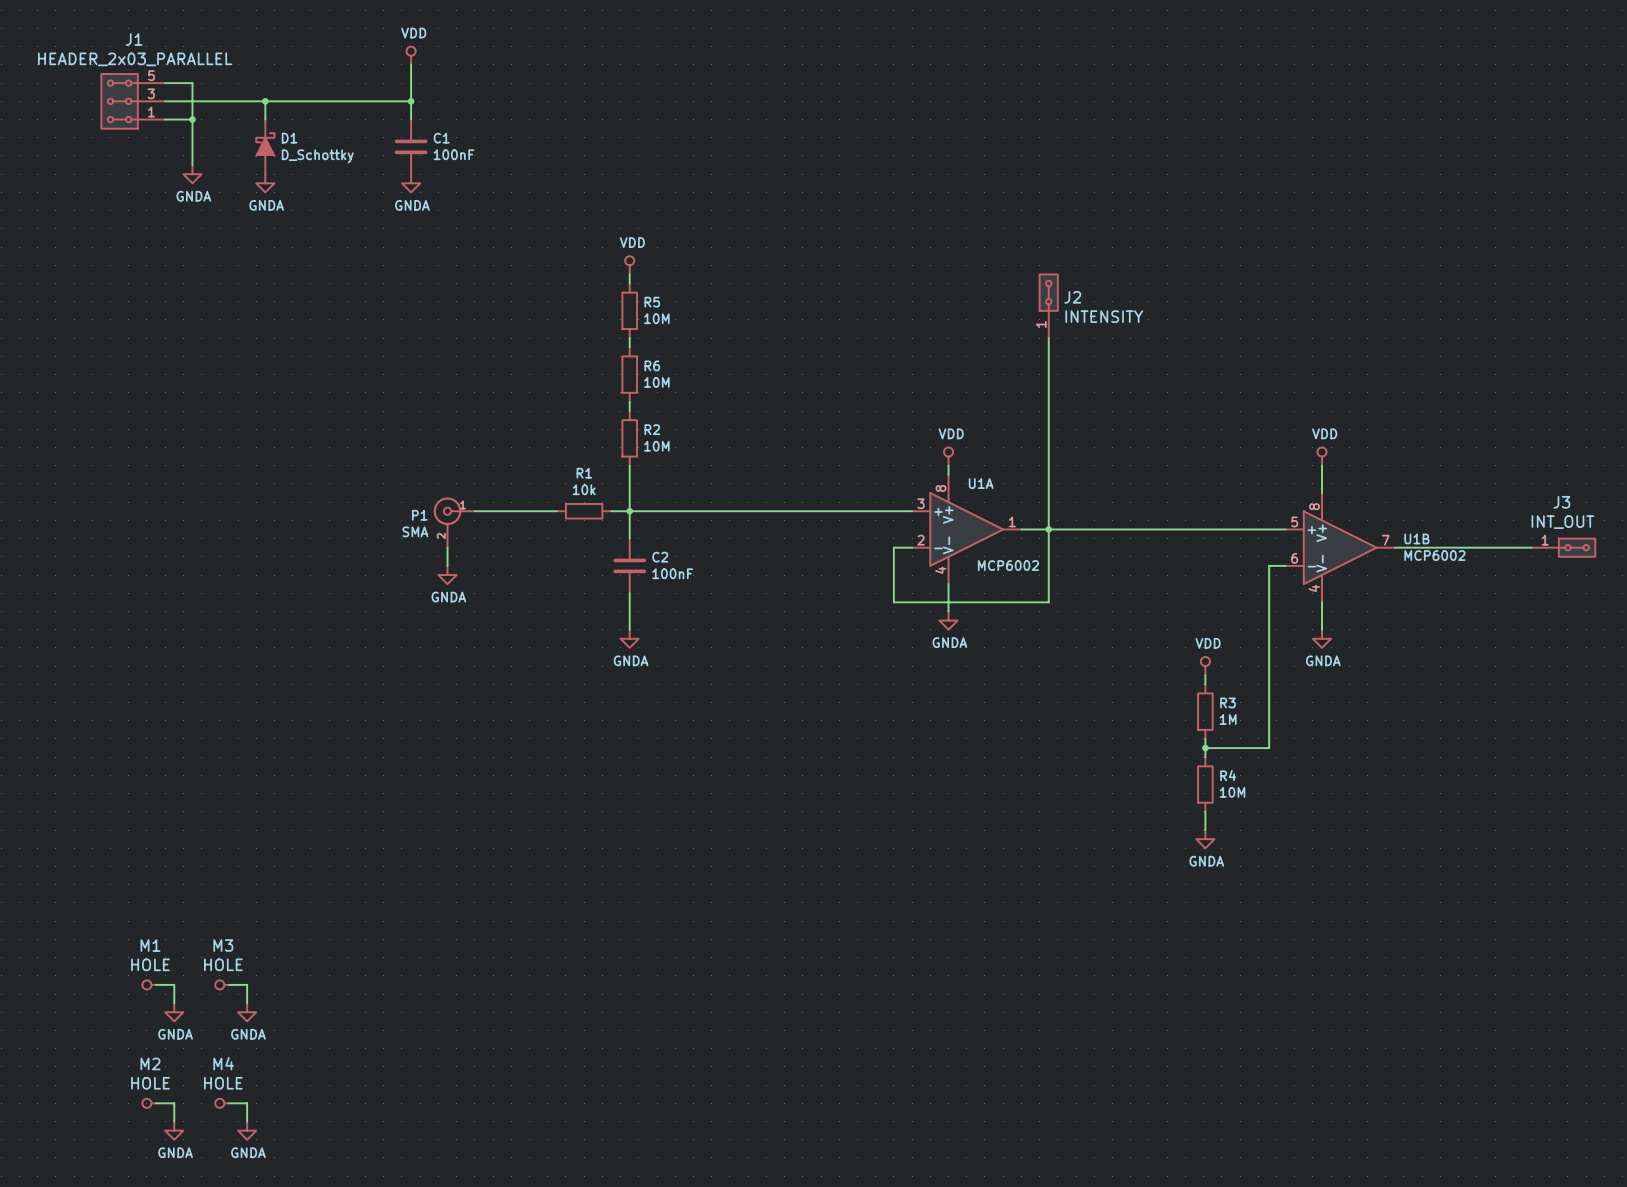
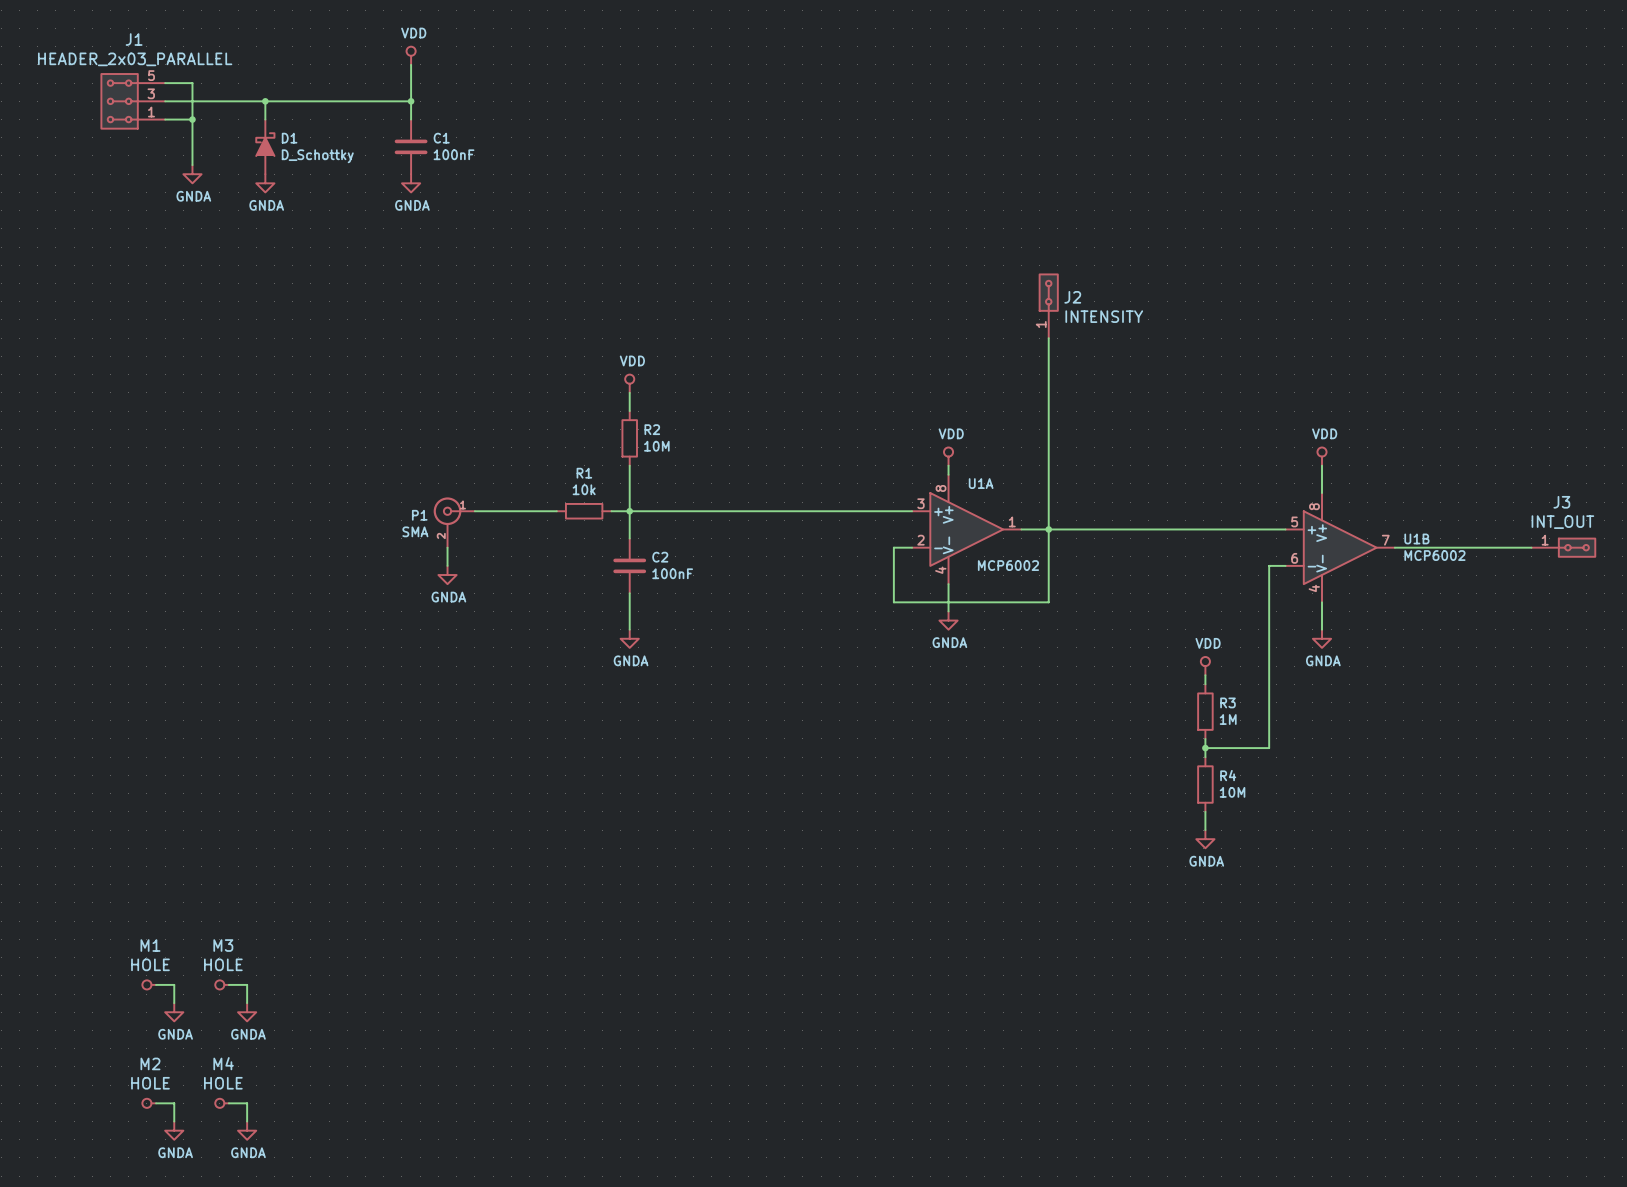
power symbol position: VDD (629, 265) -> VDD (629, 383)
wire: (629, 274) (629, 283) -> none
R5: 10M (629, 310) -> none
R6: 10M (629, 374) -> none

